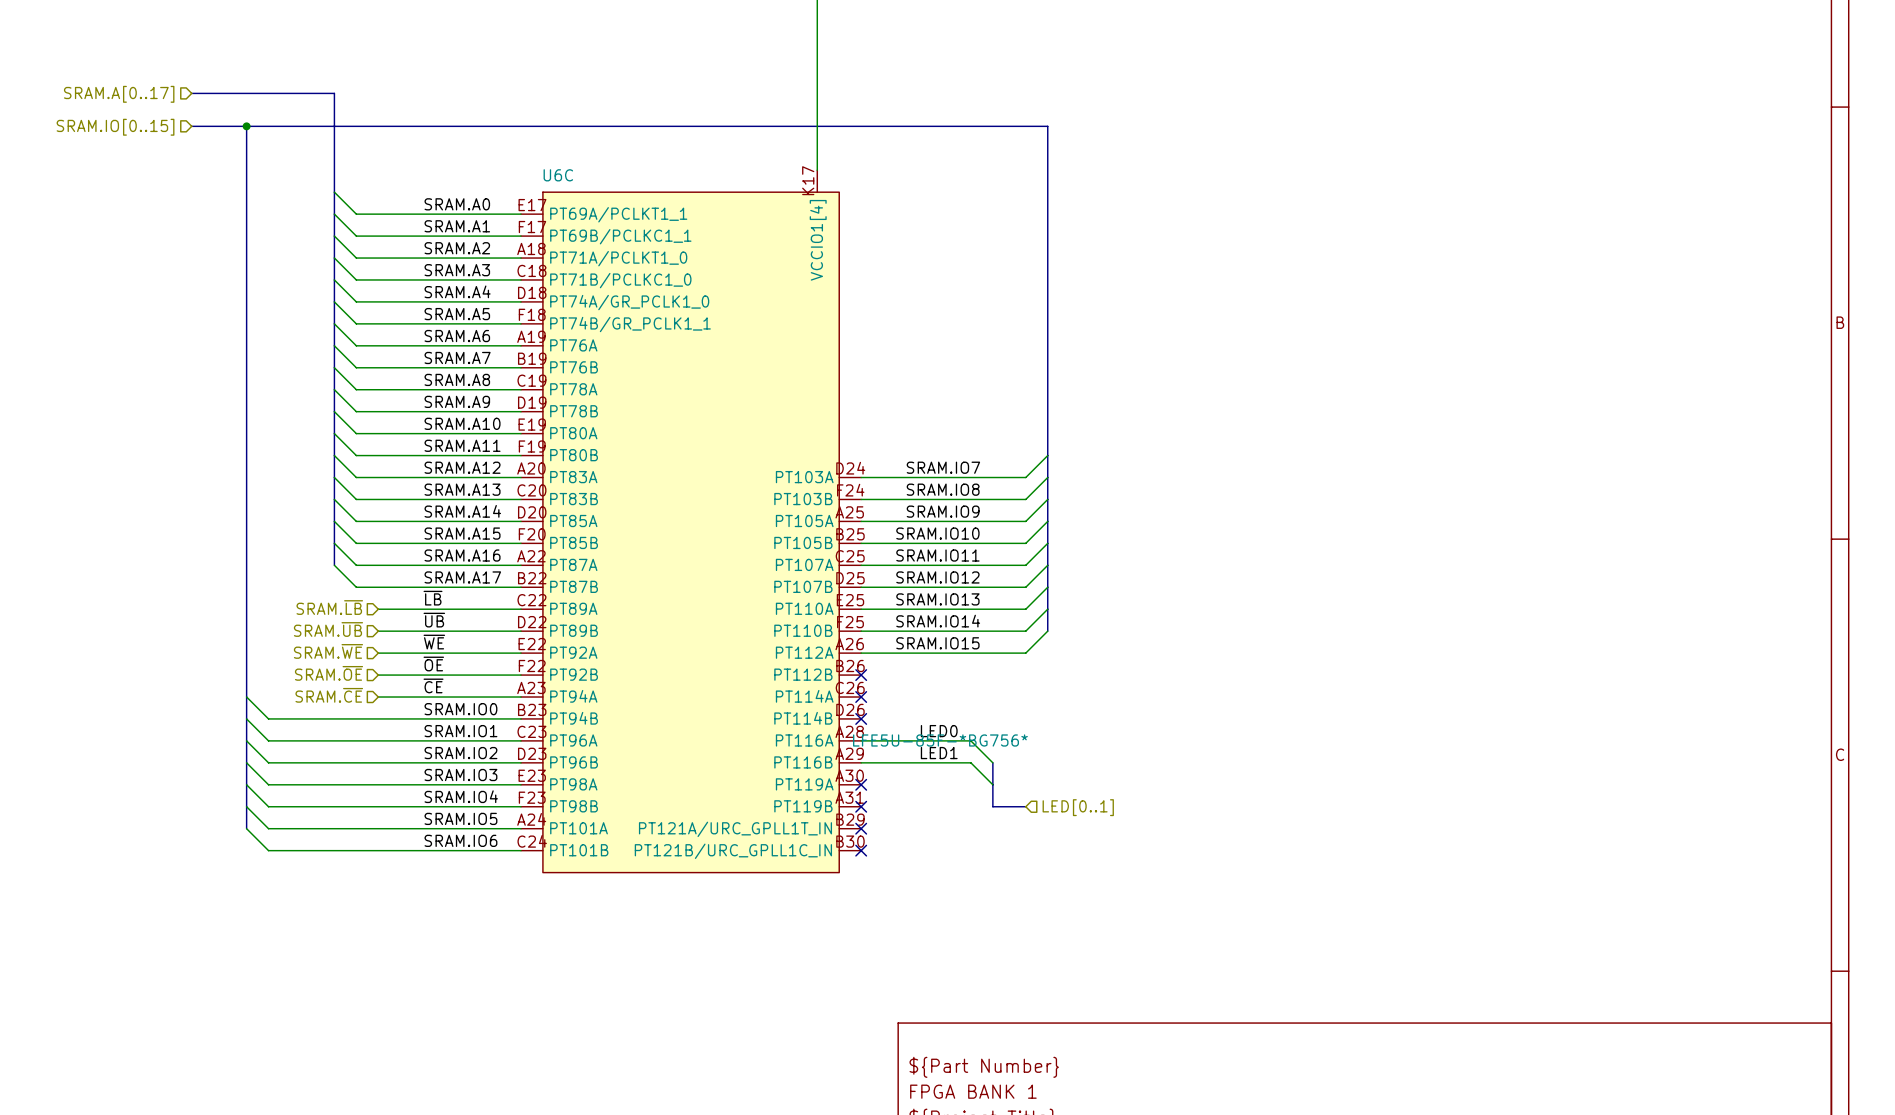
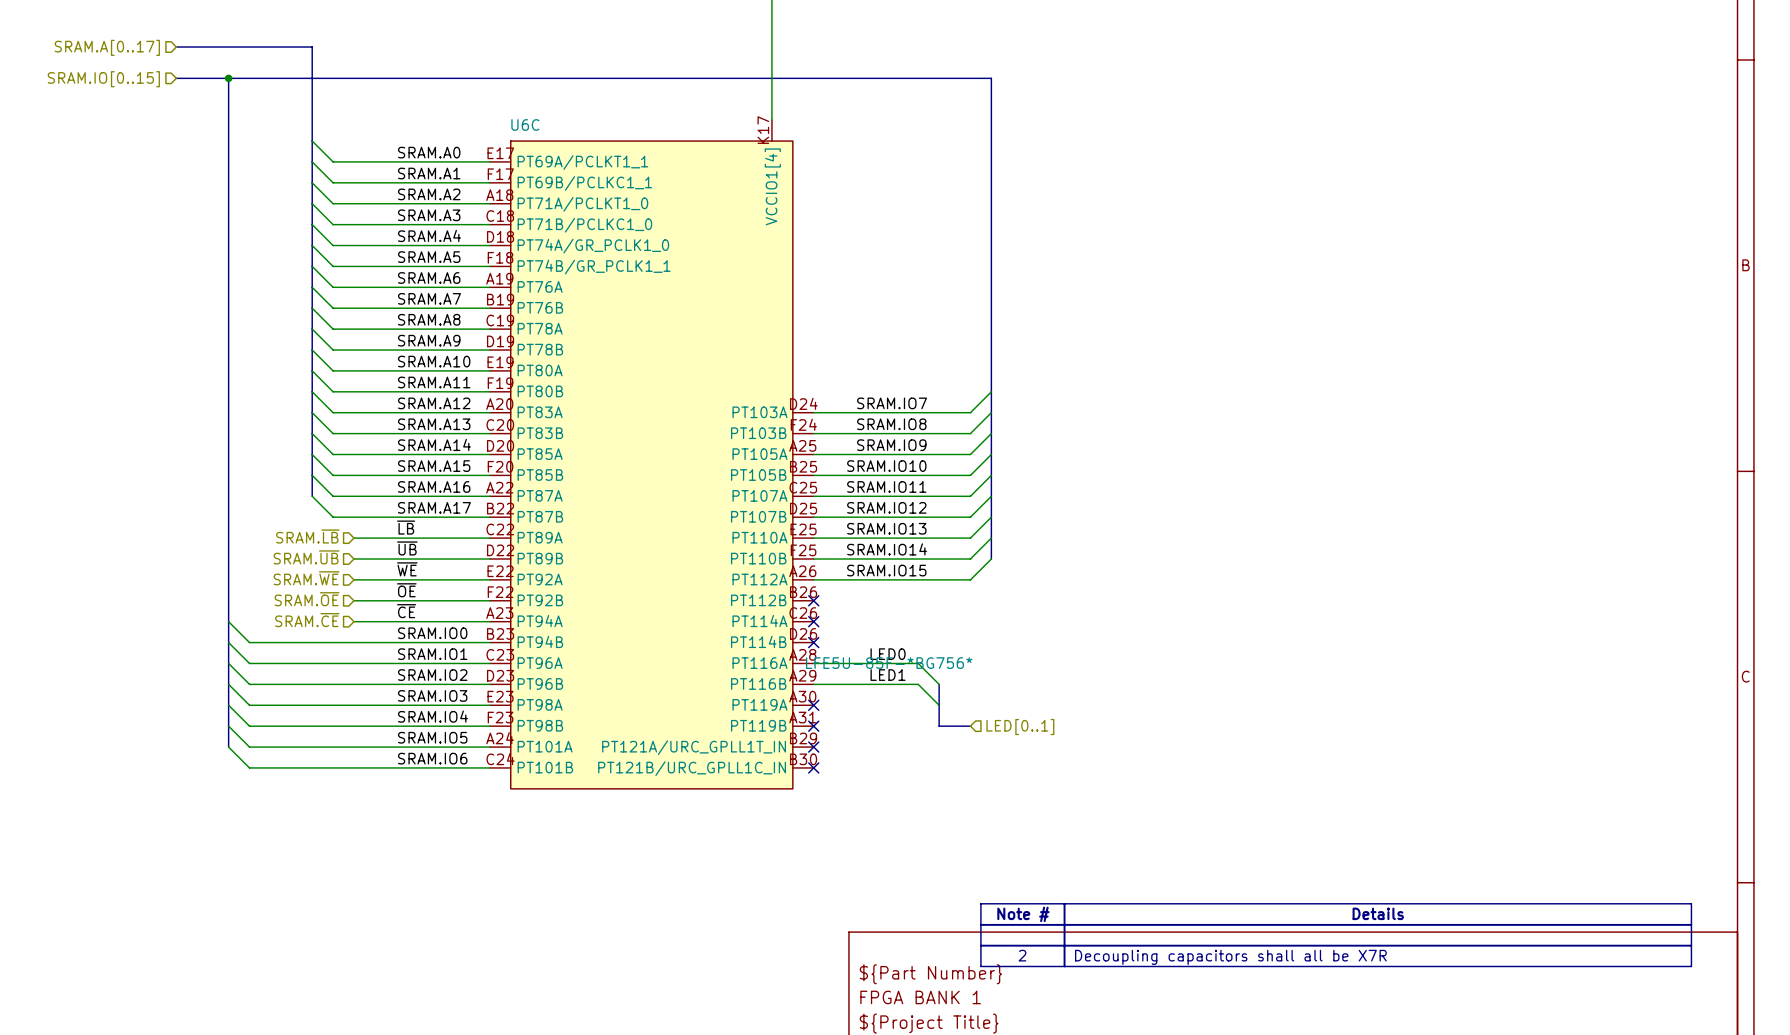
line: none -> (980, 903) (980, 966) (1691, 966) (1691, 903) (980, 903)
line: none -> (1064, 903) (1064, 966)
text: none -> Details (1378, 913)
text: none -> Note # (1023, 914)
line: none -> (980, 924) (1691, 924)
line: none -> (980, 945) (1691, 945)
text: none -> 2 (1022, 955)
text: none -> Decoupling capacitors shall all be X7R (1230, 957)

